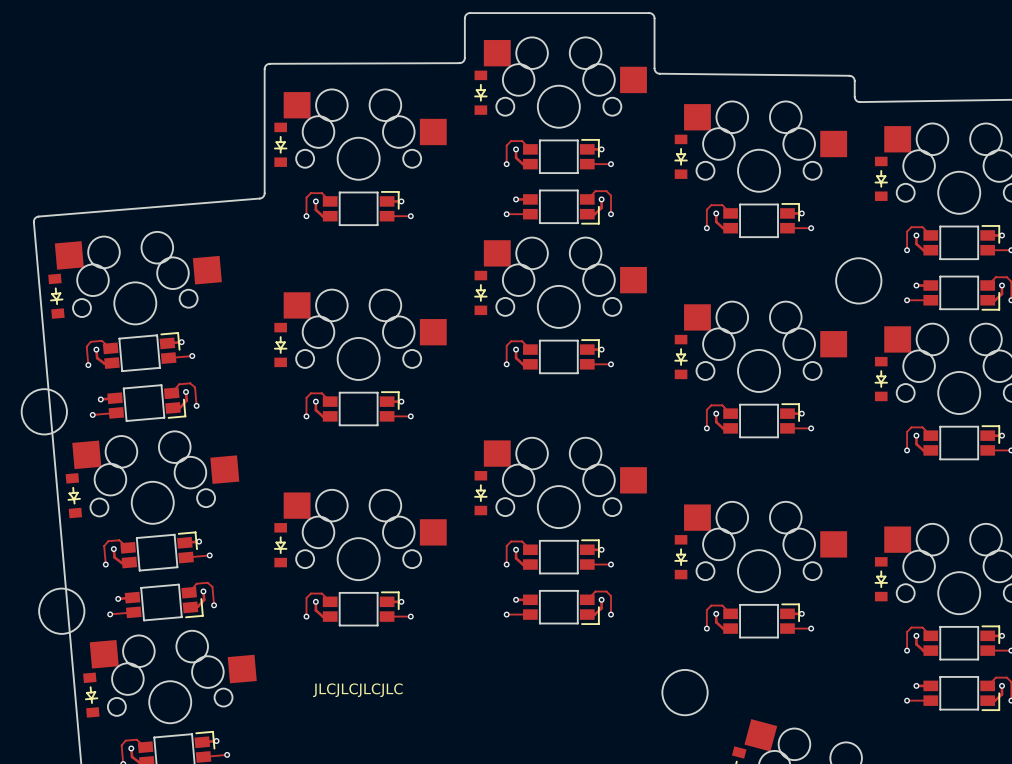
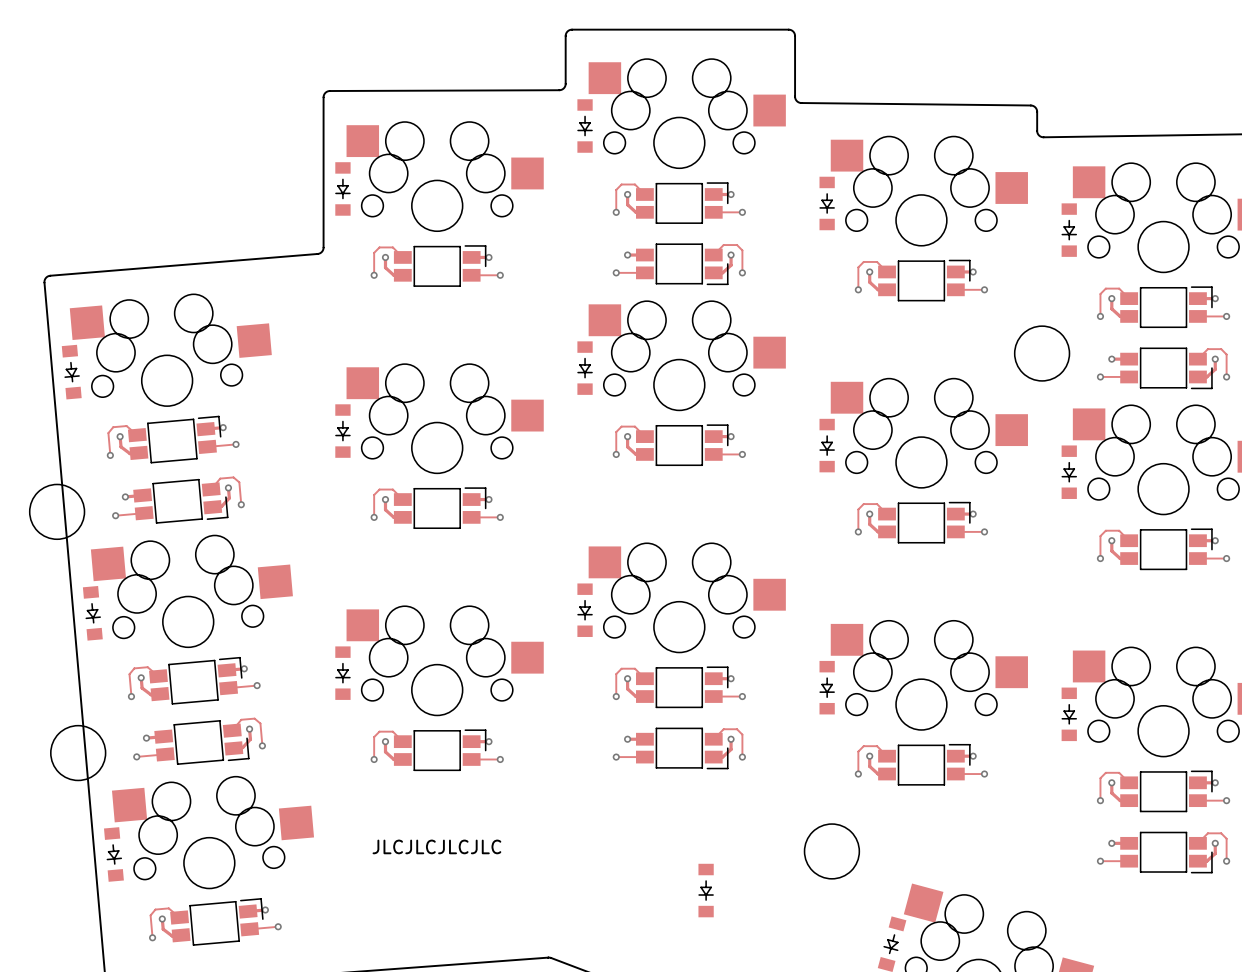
part: none -> (706, 890)

